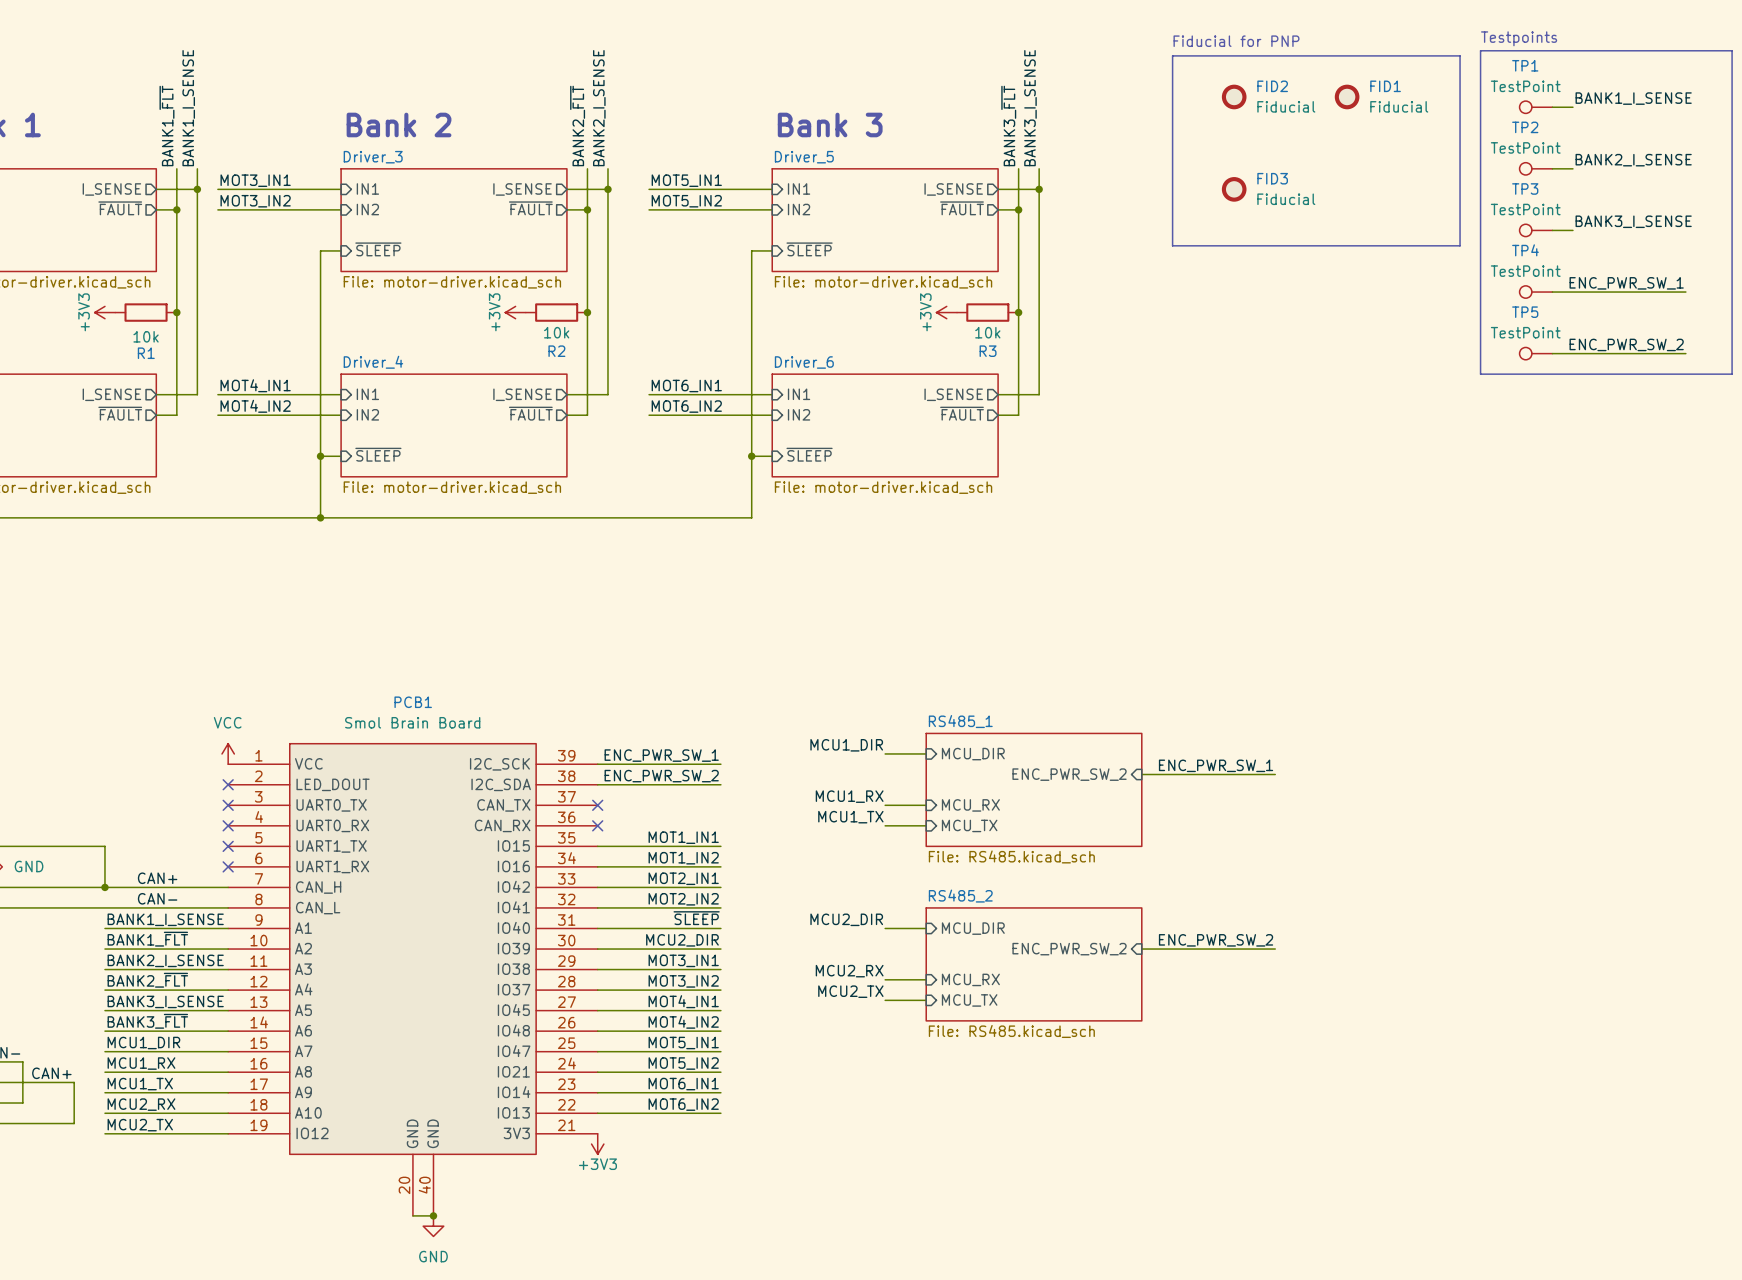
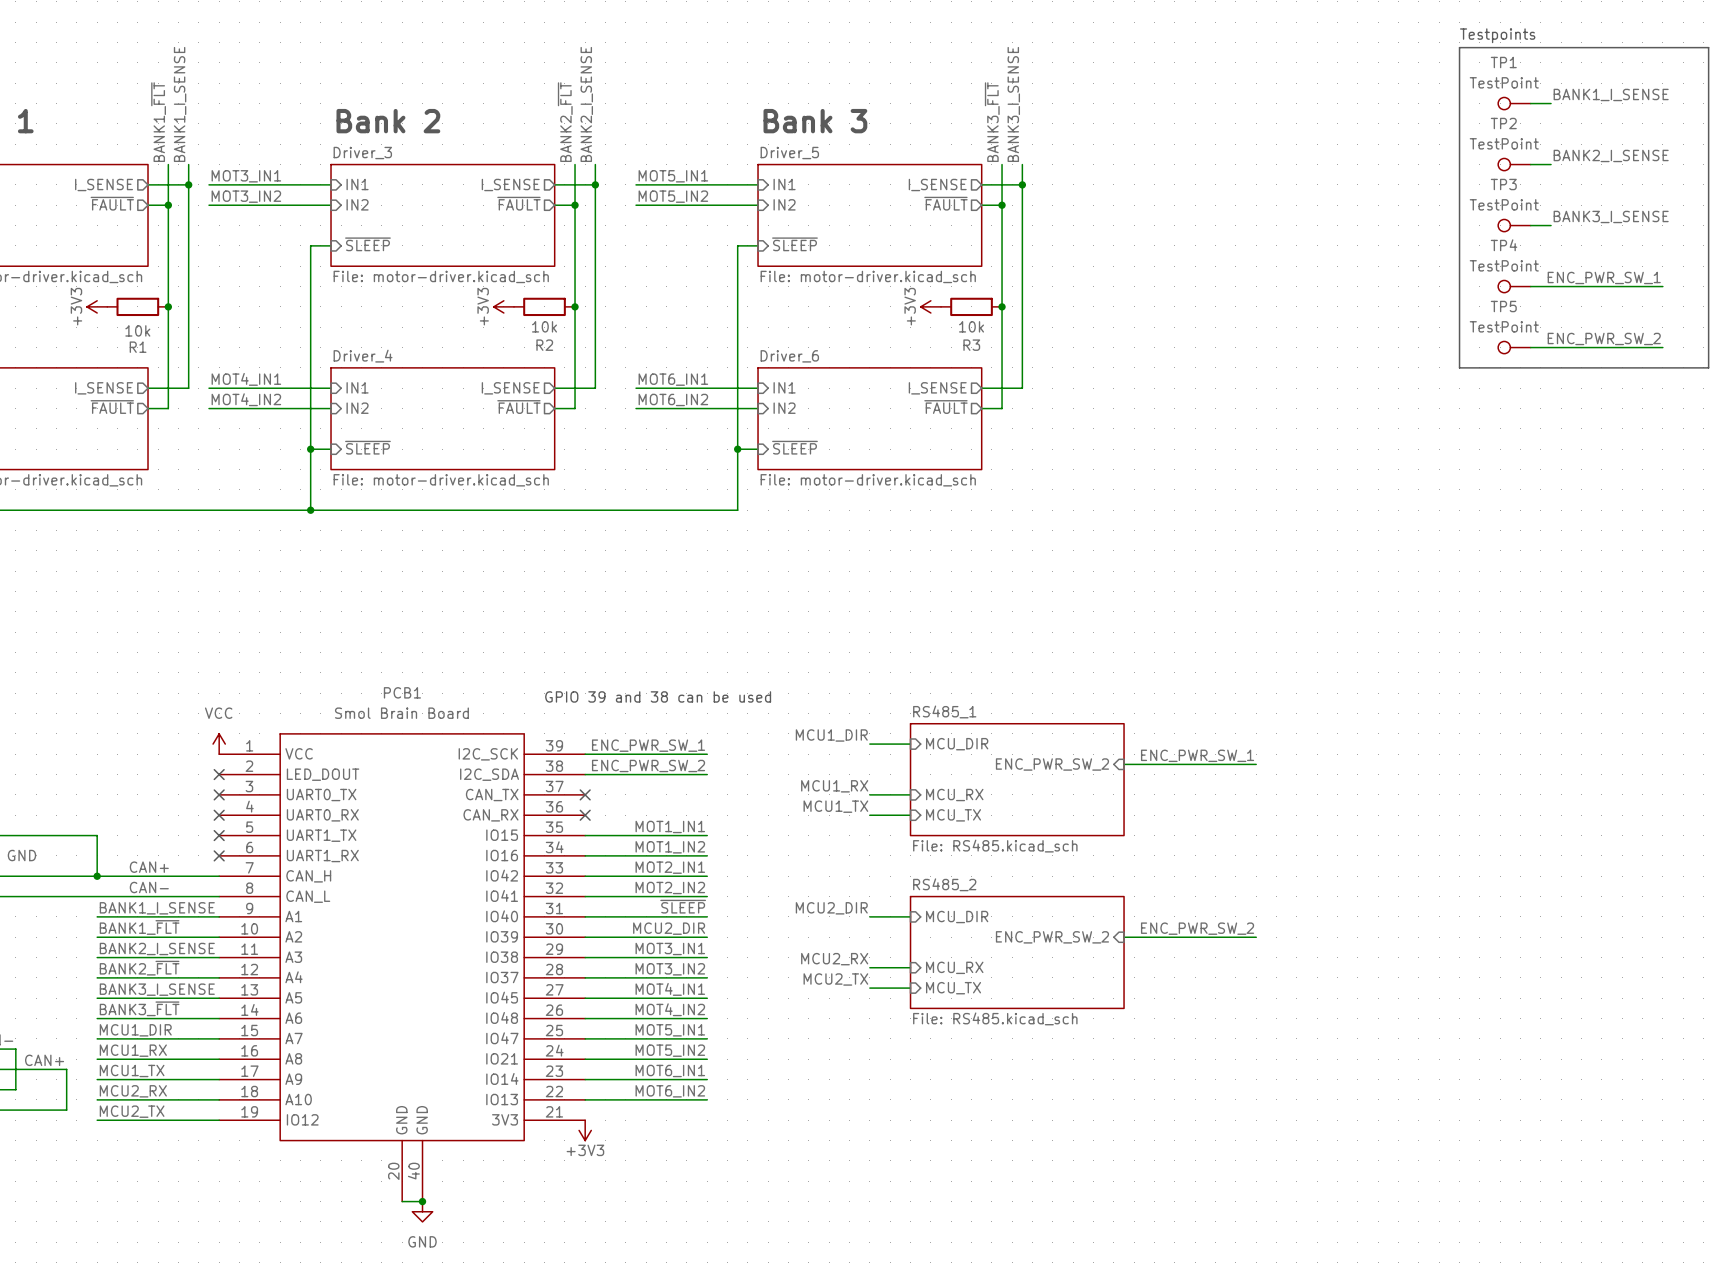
text: Fiducial for PNP (1236, 41) -> none
line: (1172, 55) (1460, 55) (1460, 245) (1172, 245) (1172, 55) -> none
FID2: Fiducial (1234, 96) -> none
FID1: Fiducial (1347, 96) -> none
FID3: Fiducial (1234, 189) -> none
text: none -> GPIO 39 and 38 can be used (658, 696)

